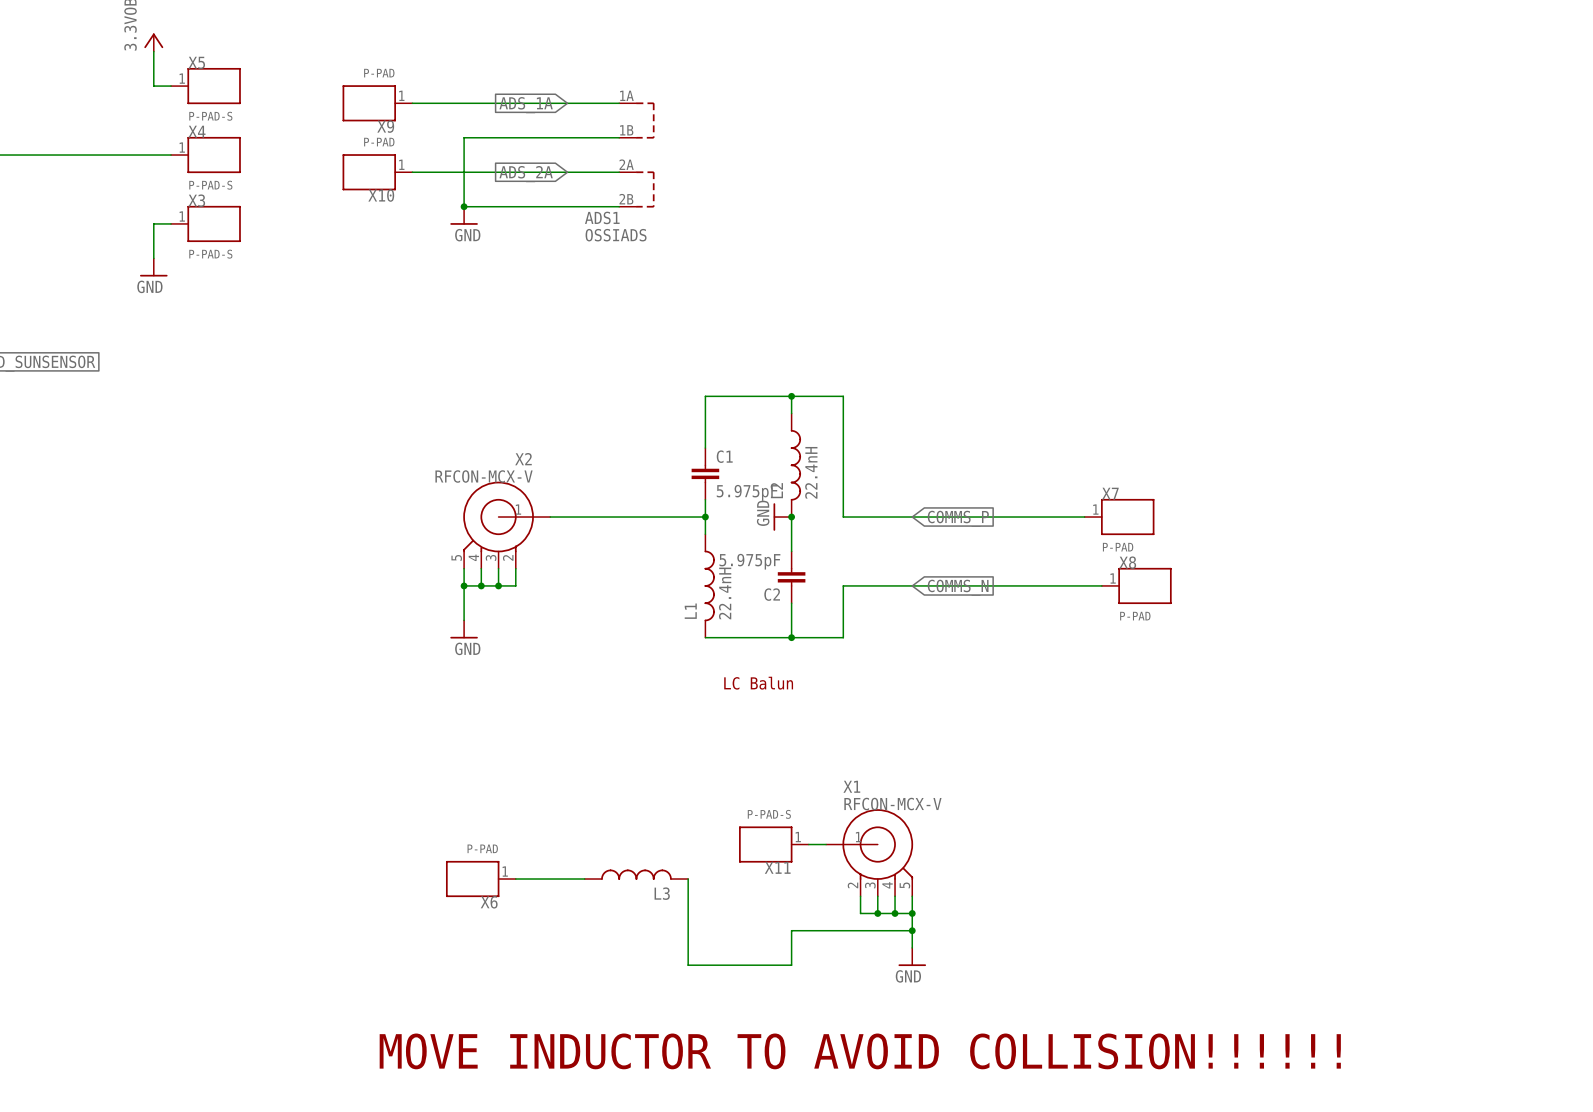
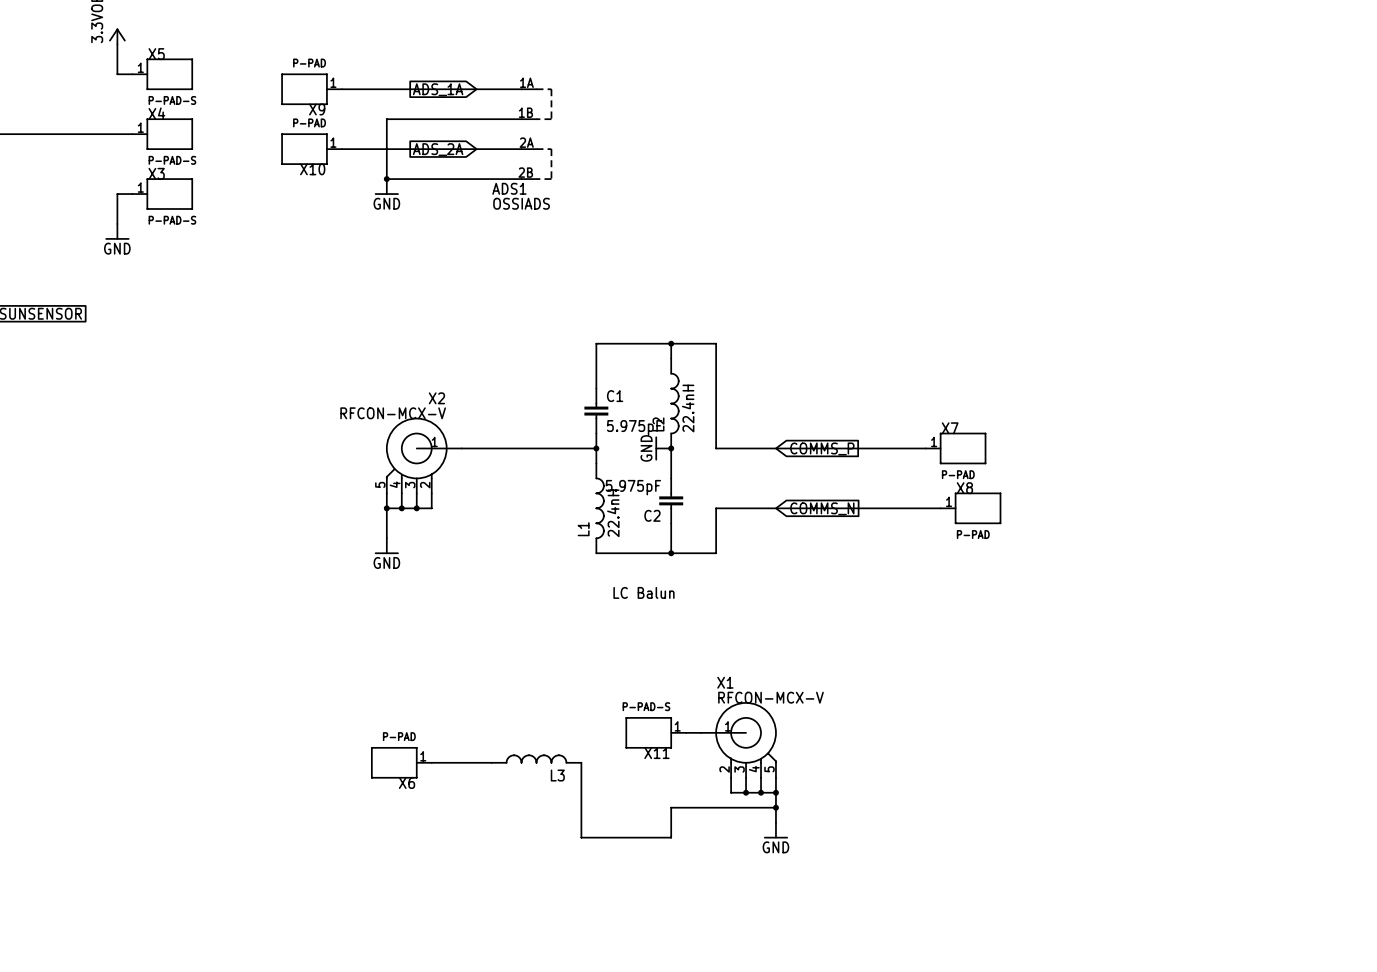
text: MOVE INDUCTOR TO AVOID COLLISION!!!!!! (860, 1051) -> none

